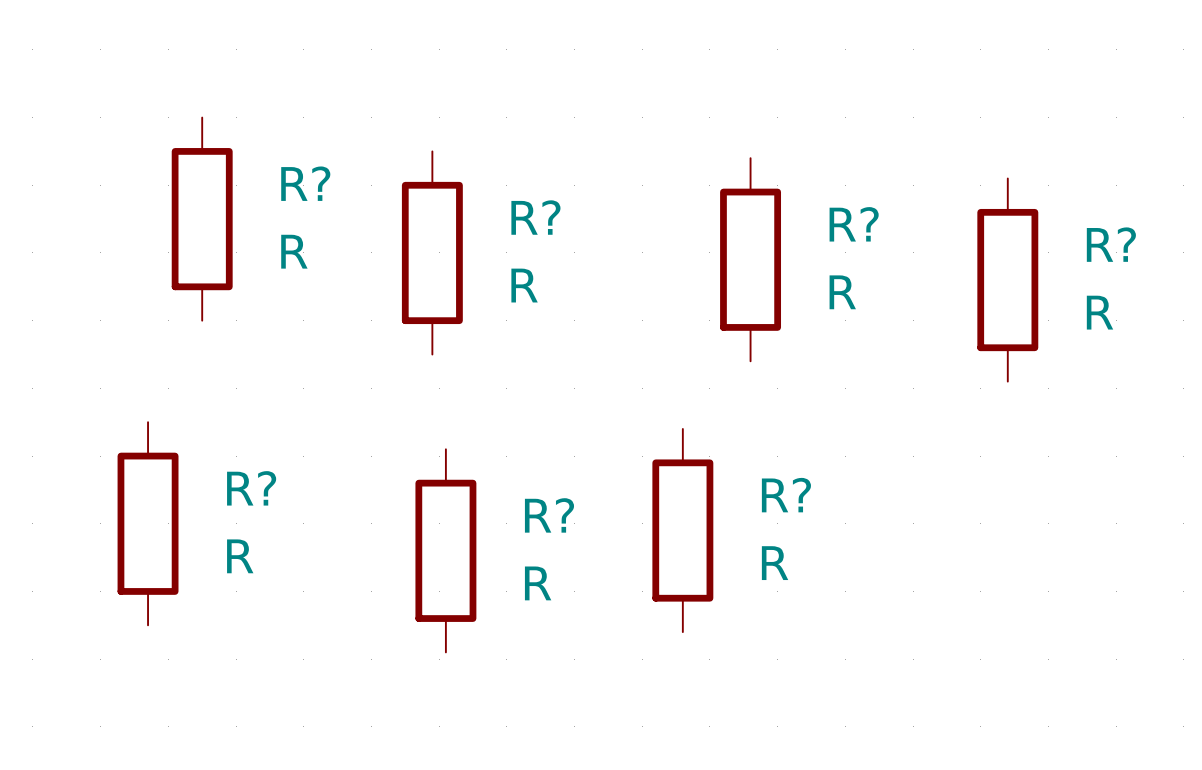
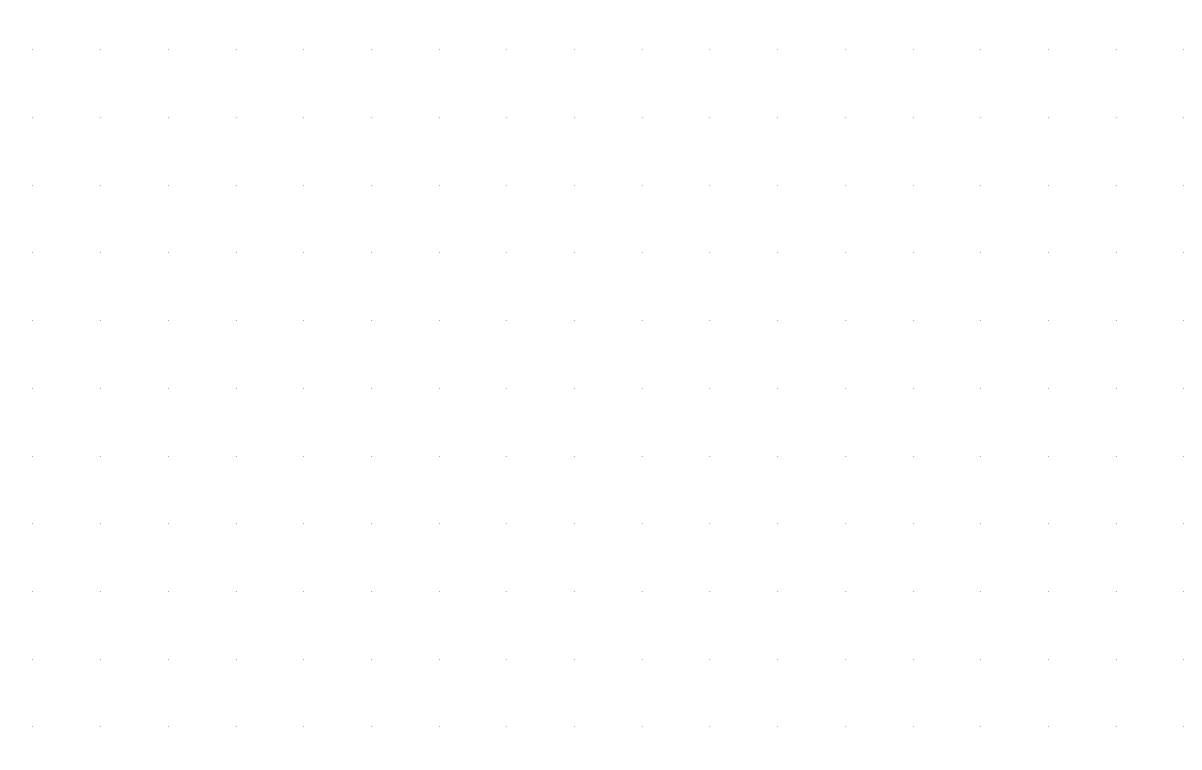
R?: R (202, 219) -> none
R?: R (432, 252) -> none
R?: R (750, 259) -> none
R?: R (1007, 280) -> none
R?: R (148, 523) -> none
R?: R (682, 530) -> none
R?: R (445, 550) -> none

